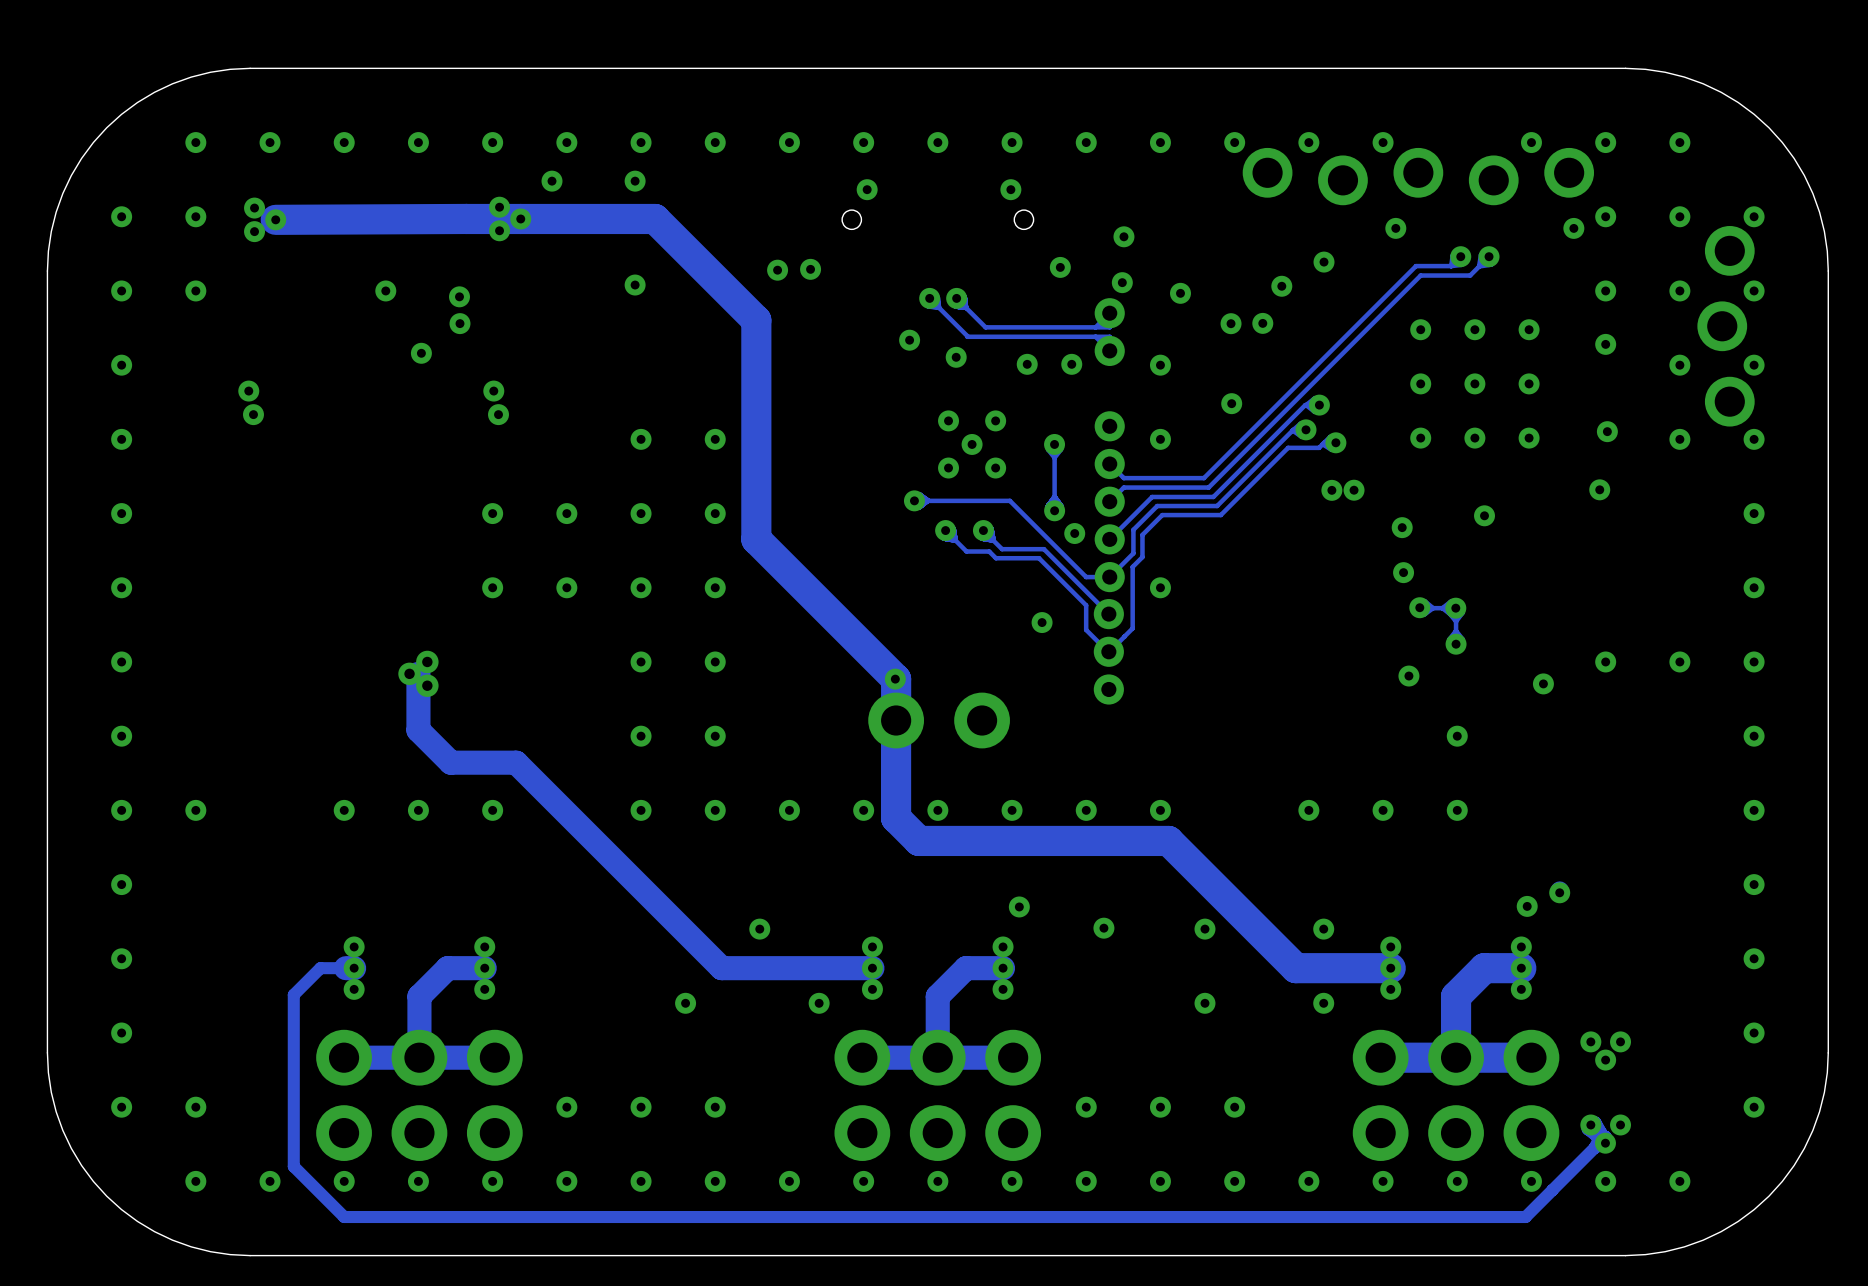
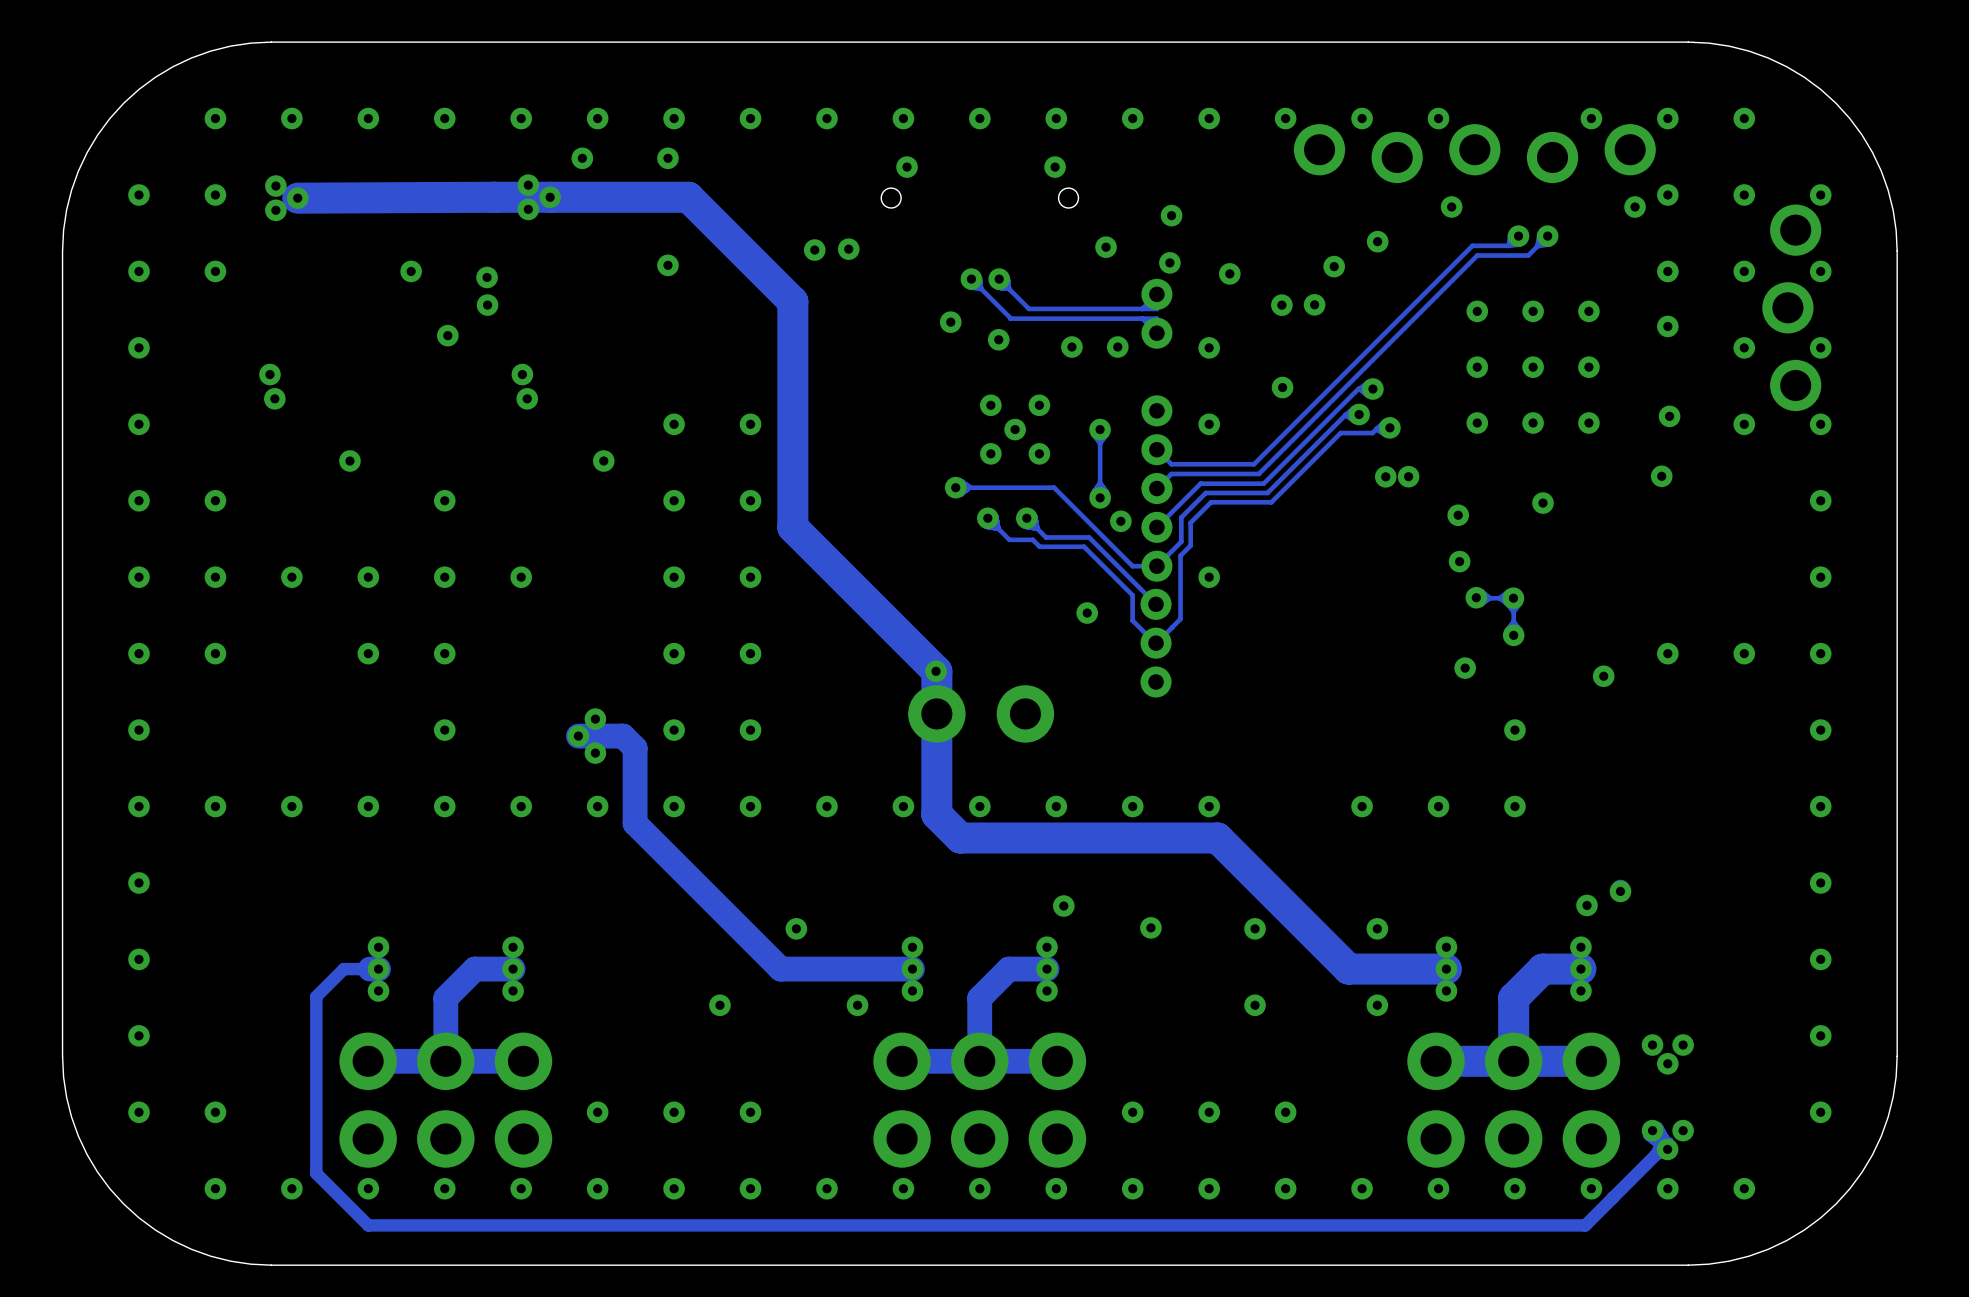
via: none -> (349, 461)
via: none -> (215, 500)
via: none -> (444, 500)
via: (492, 513) -> none
via position: (566, 513) -> (603, 461)
via: none -> (215, 577)
via: none -> (291, 577)
via: none -> (368, 577)
via: none -> (444, 577)
via: (566, 587) -> none
via: none -> (215, 653)
via: none -> (368, 653)
via: none -> (444, 653)
via: (427, 661) -> none
via: (409, 673) -> none
track: (418, 673) (418, 730) (450, 762) (516, 762) (721, 968) (744, 968) -> (578, 736) (622, 736) (635, 748) (635, 823) (780, 969)
via: (427, 685) -> none
via: none -> (595, 719)
via: none -> (444, 730)
via: none -> (578, 736)
via: none -> (595, 753)
via: none -> (291, 806)
via: none -> (597, 806)

